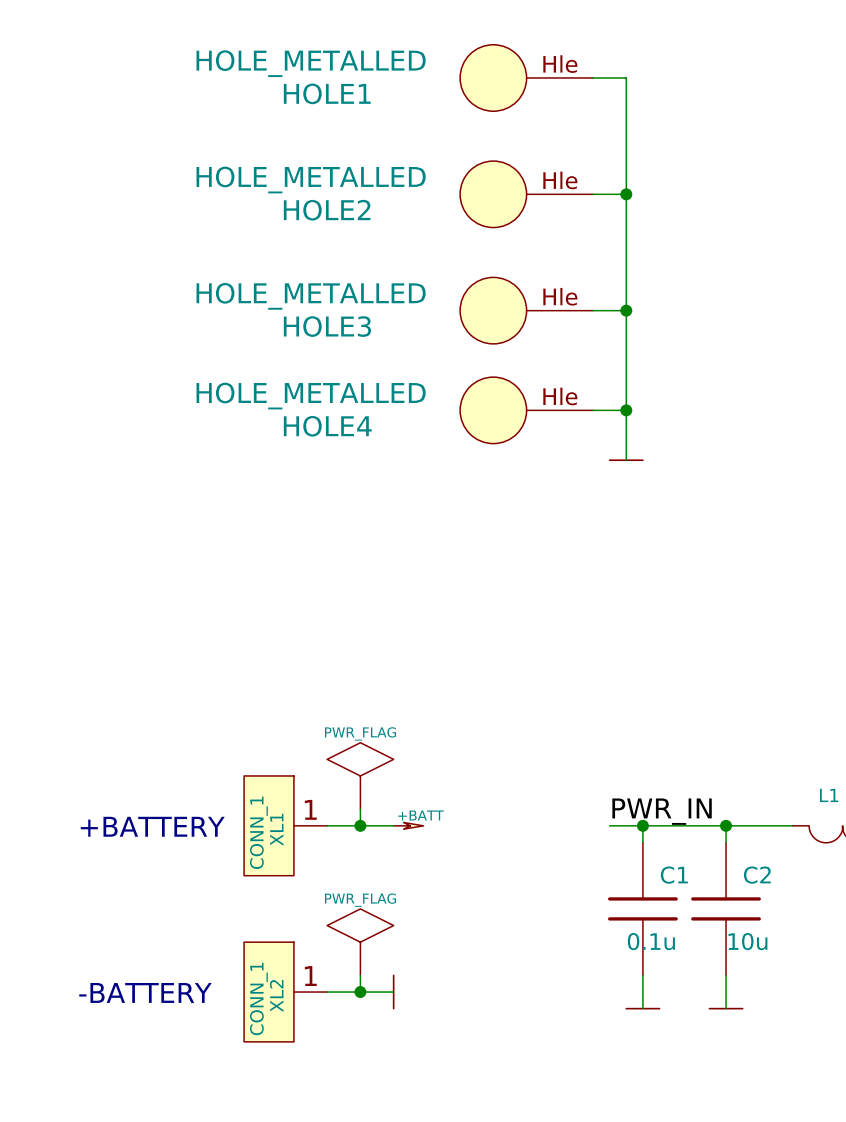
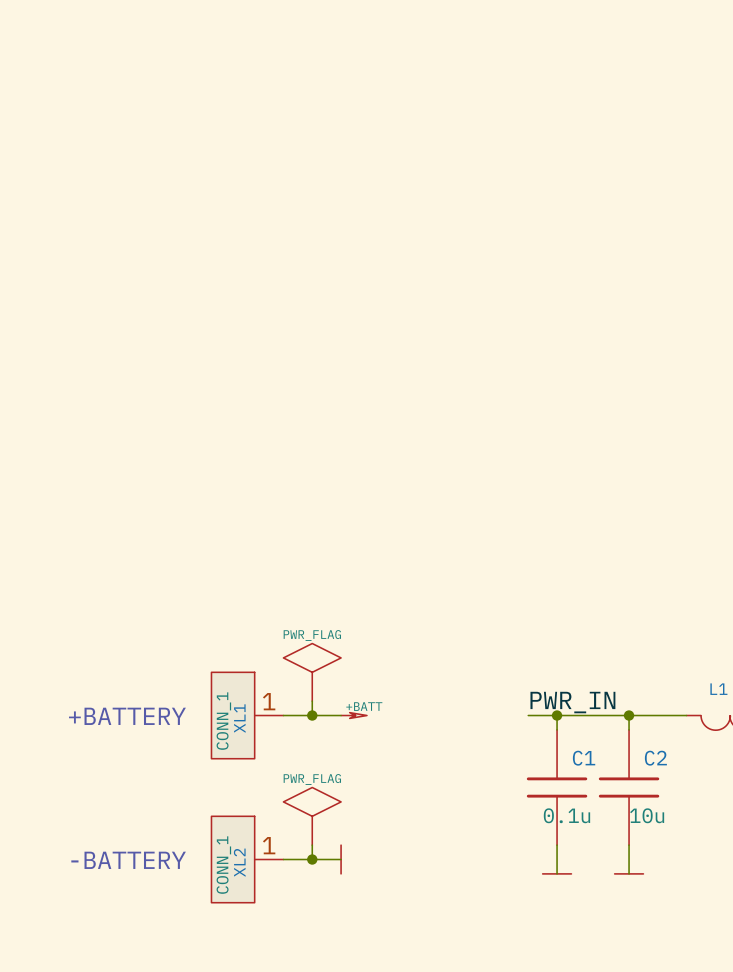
HOLE1: HOLE_METALLED (526, 77) -> none
wire: (593, 77) (626, 77) (626, 460) -> none
HOLE2: HOLE_METALLED (526, 194) -> none
wire: (593, 194) (626, 194) -> none
junction: (626, 194) -> none
HOLE3: HOLE_METALLED (526, 310) -> none
wire: (593, 310) (626, 310) -> none
junction: (626, 310) -> none
HOLE4: HOLE_METALLED (526, 410) -> none
wire: (593, 410) (626, 410) -> none
junction: (626, 410) -> none
power symbol: (626, 460) -> none

